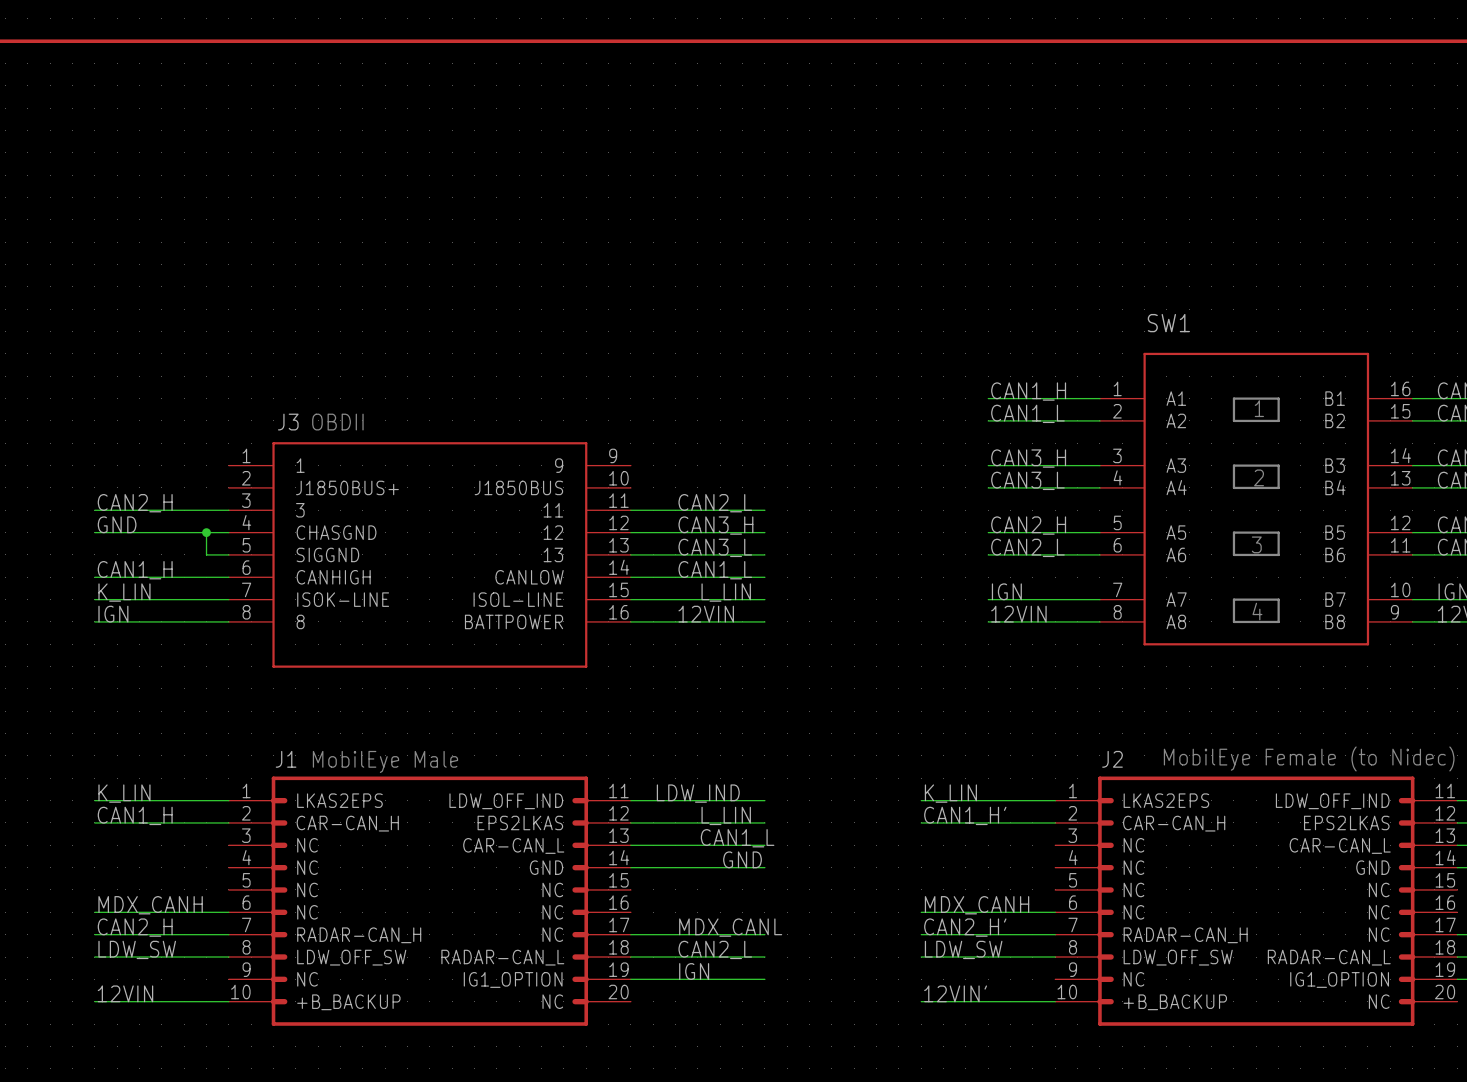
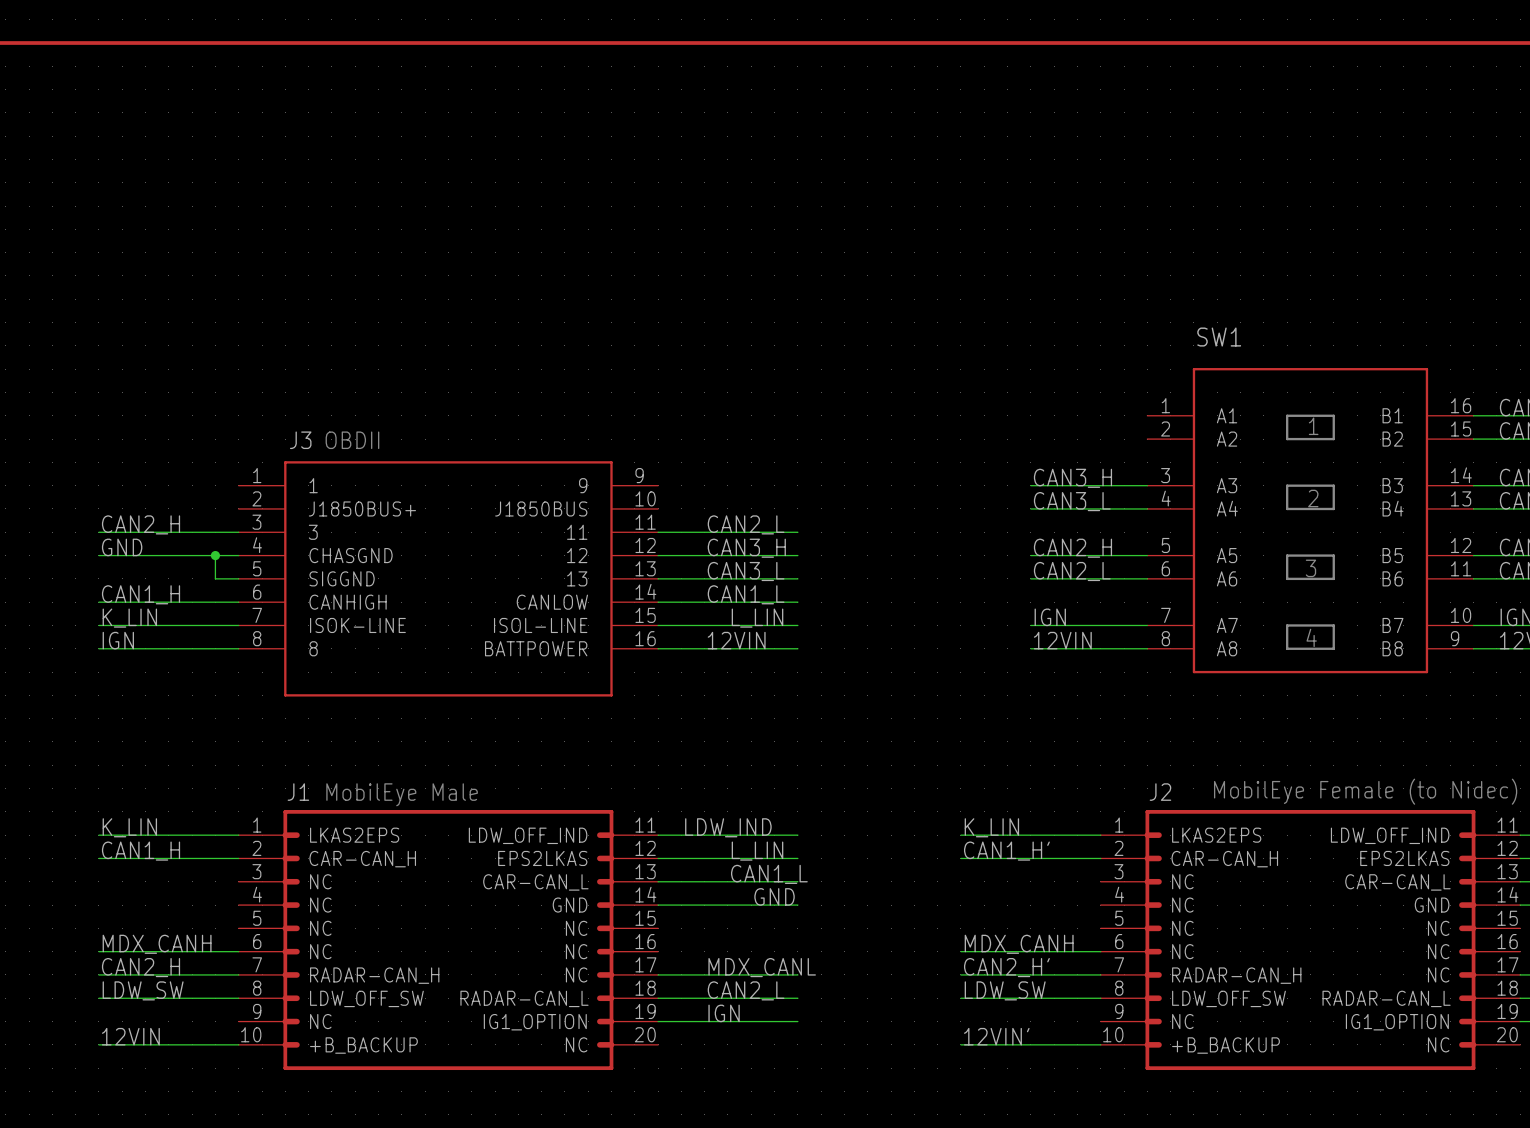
label: CAN1_H (1028, 391) -> none
wire: (988, 398) (1099, 398) -> none
label: CAN1_L (1027, 413) -> none
wire: (988, 420) (1099, 420) -> none

